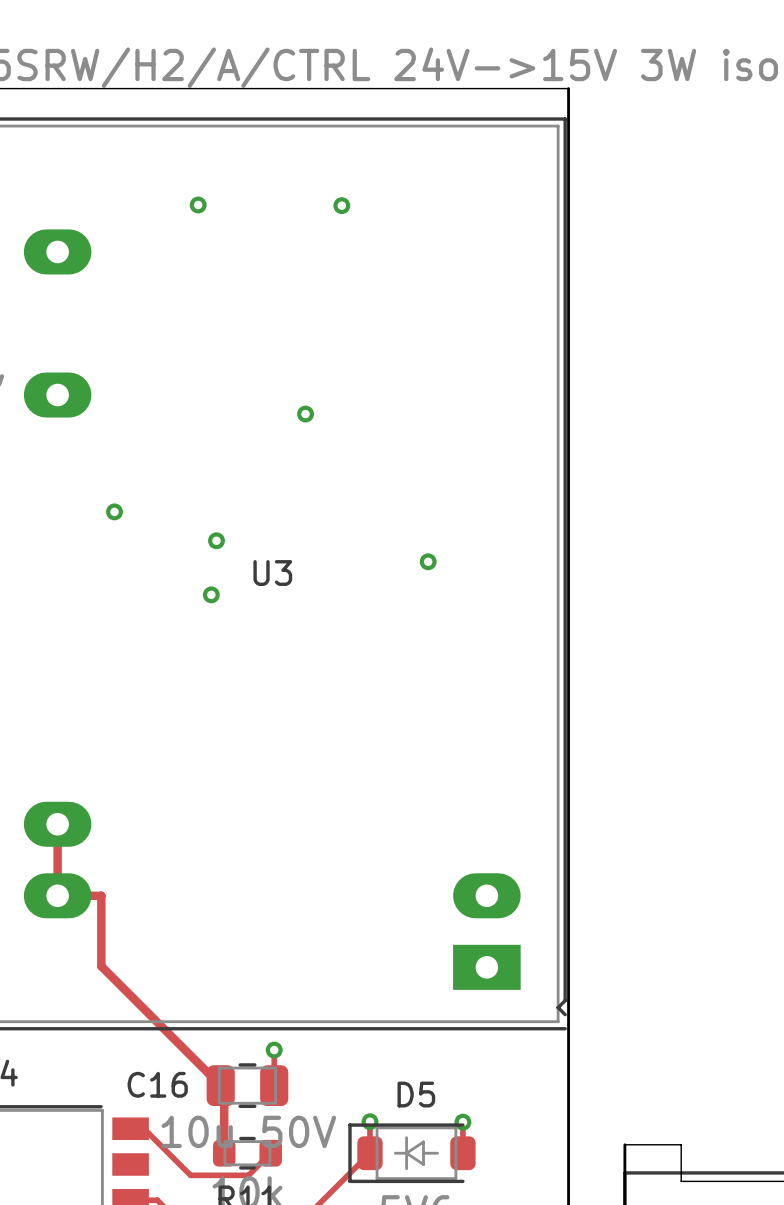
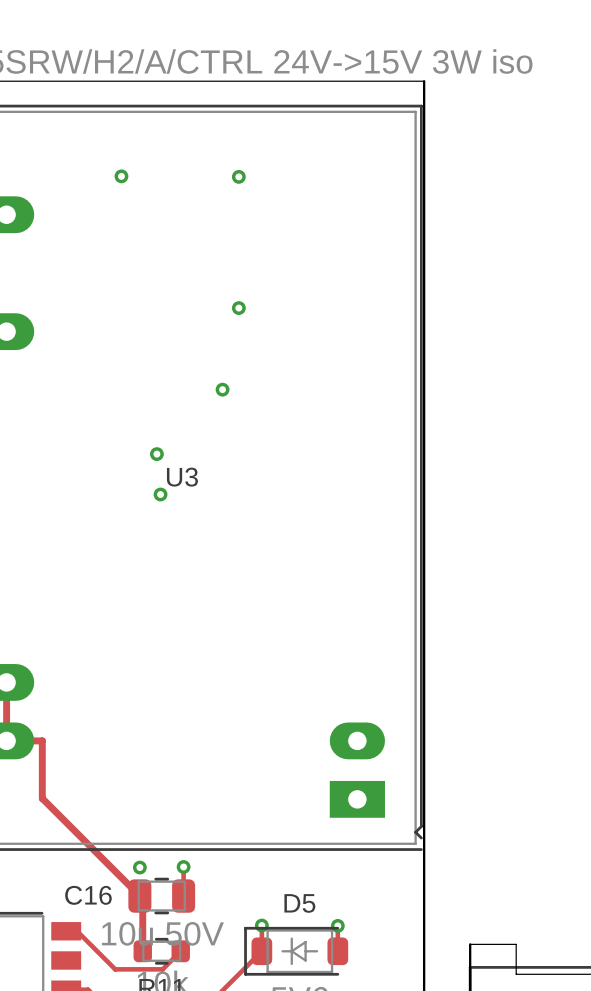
via: none -> (238, 308)
via: (305, 414) -> none
via: none -> (222, 389)
via: (114, 511) -> none
via position: (216, 540) -> (156, 454)
via: (428, 561) -> none
via: (211, 594) -> none
via: none -> (160, 494)
via: none -> (139, 867)

